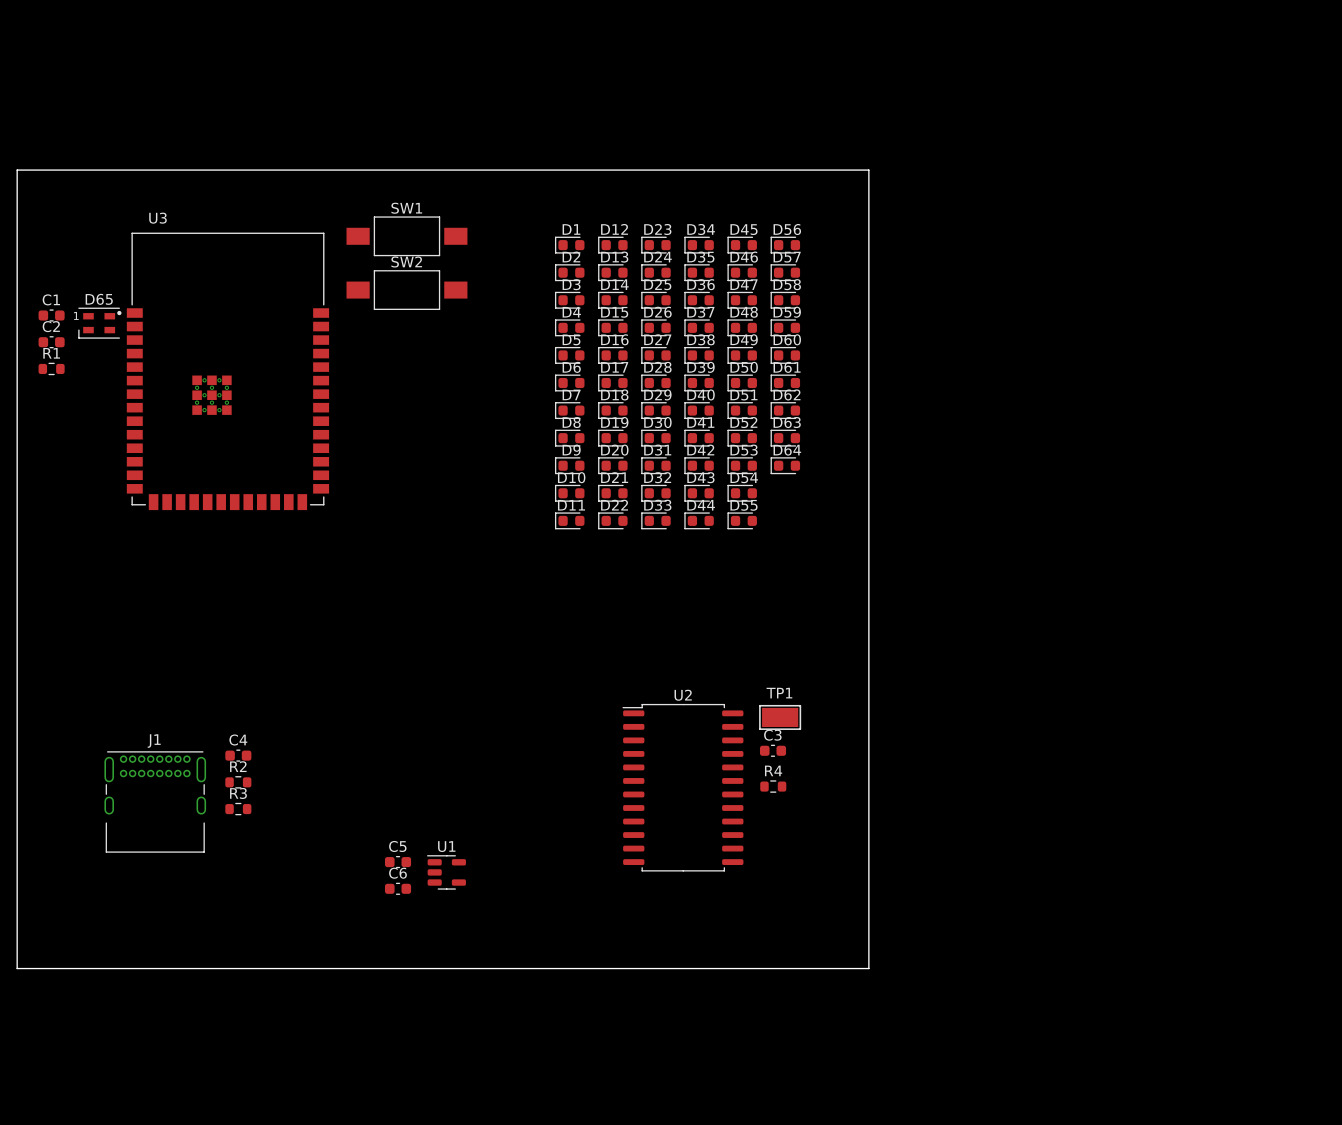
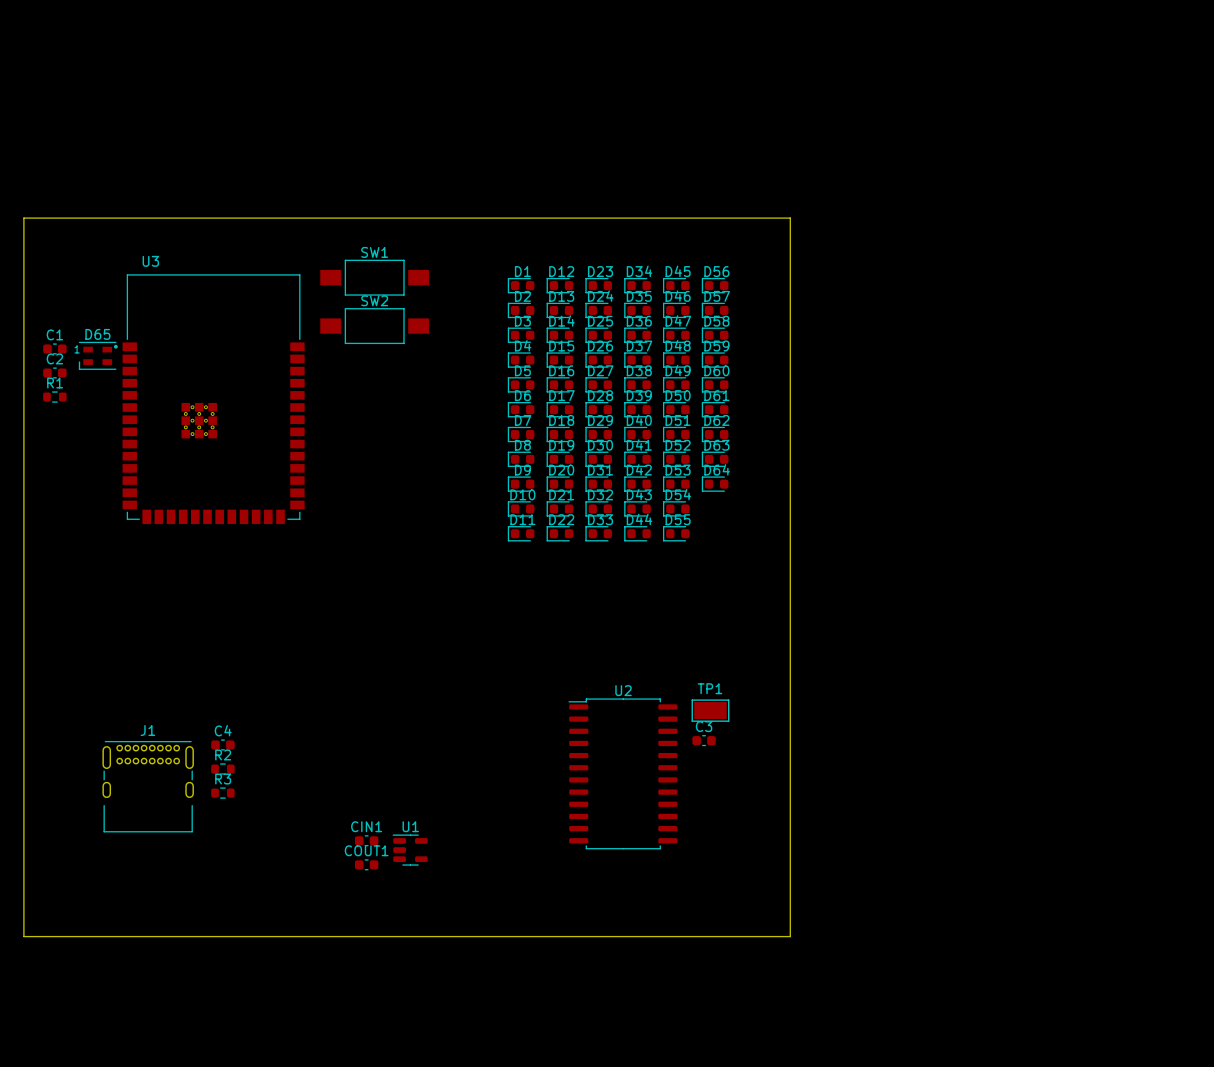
R4: (773, 786) -> none
C5 name: C5 (397, 846) -> CIN1 (366, 826)
C6 name: C6 (397, 873) -> COUT1 (366, 850)

